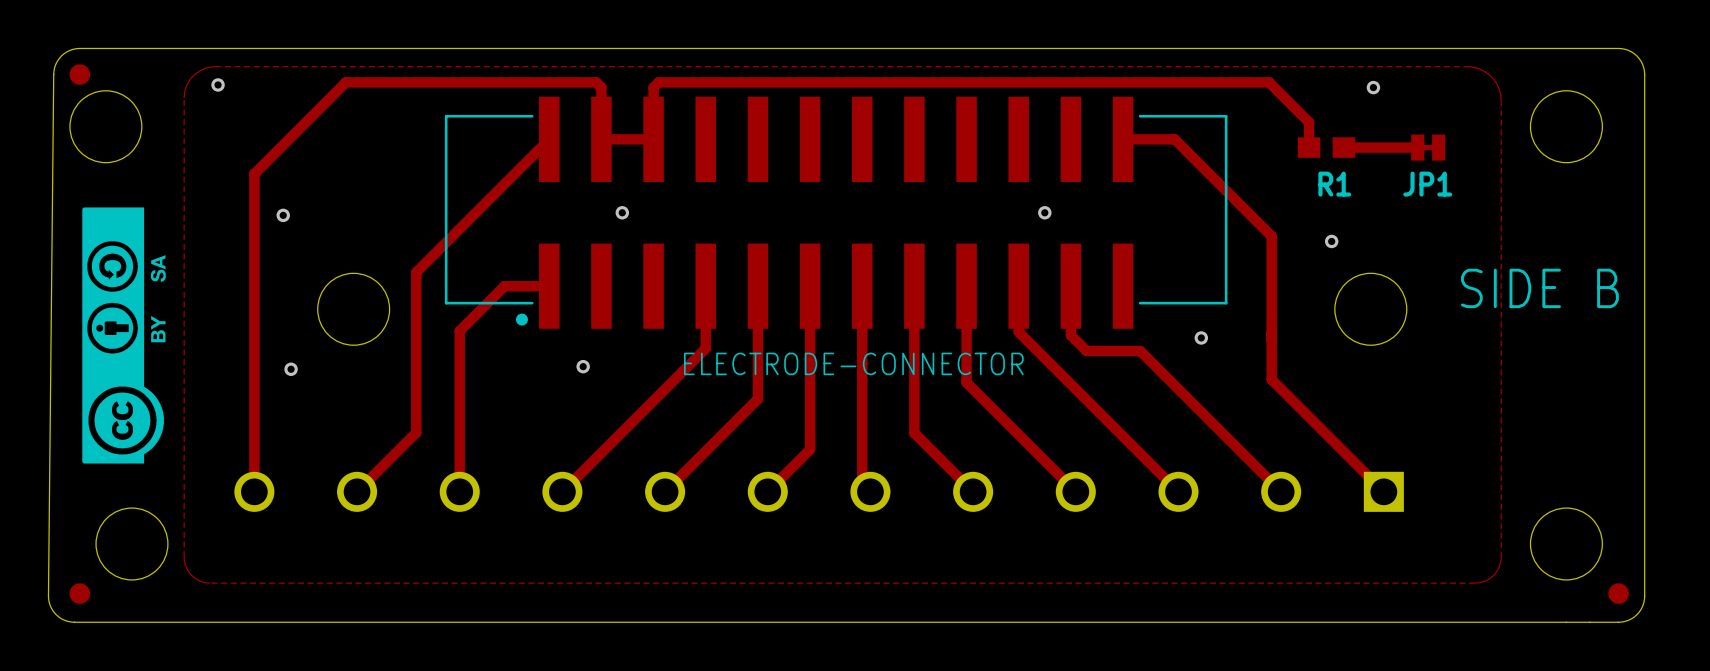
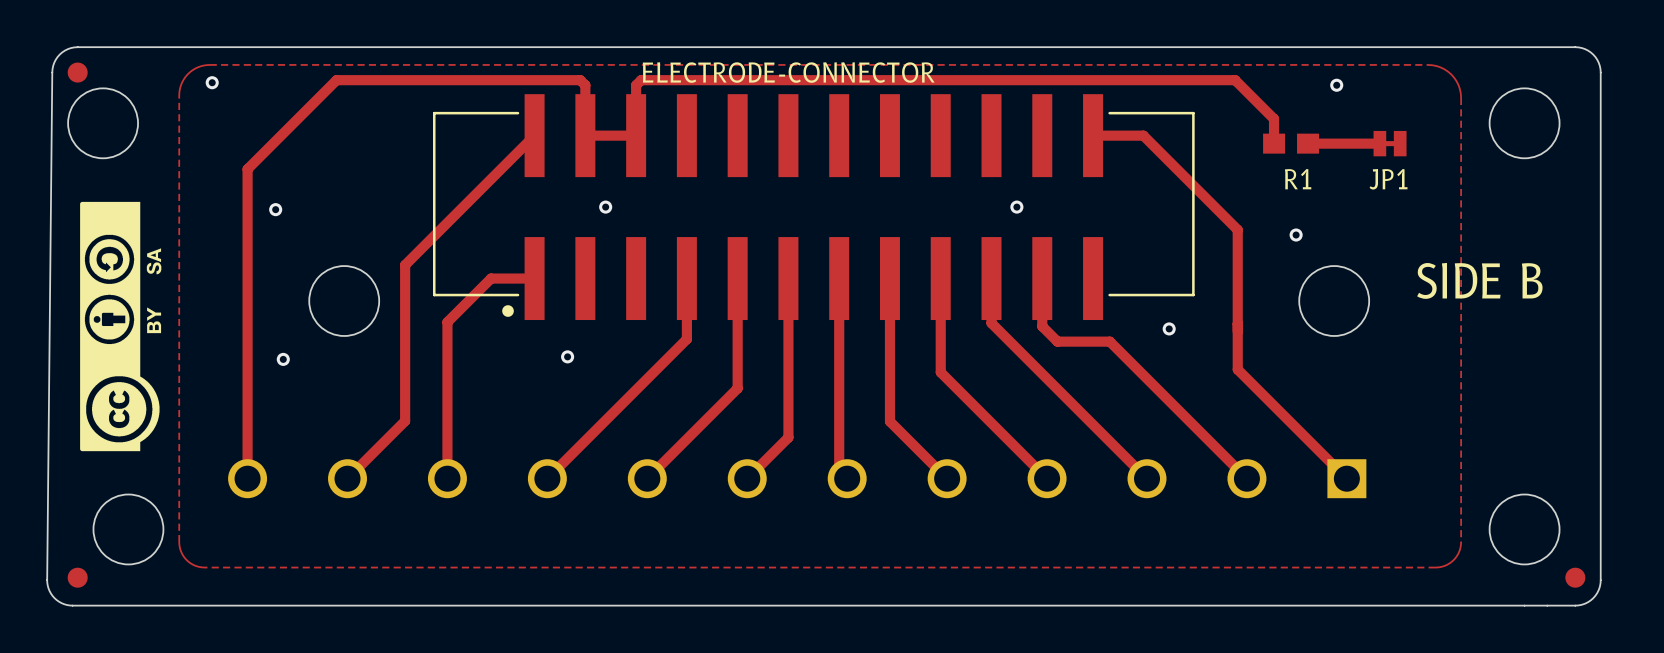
ELECTRODE-CONNECTOR name position: ELECTRODE-CONNECTOR (853, 363) -> ELECTRODE-CONNECTOR (788, 72)

